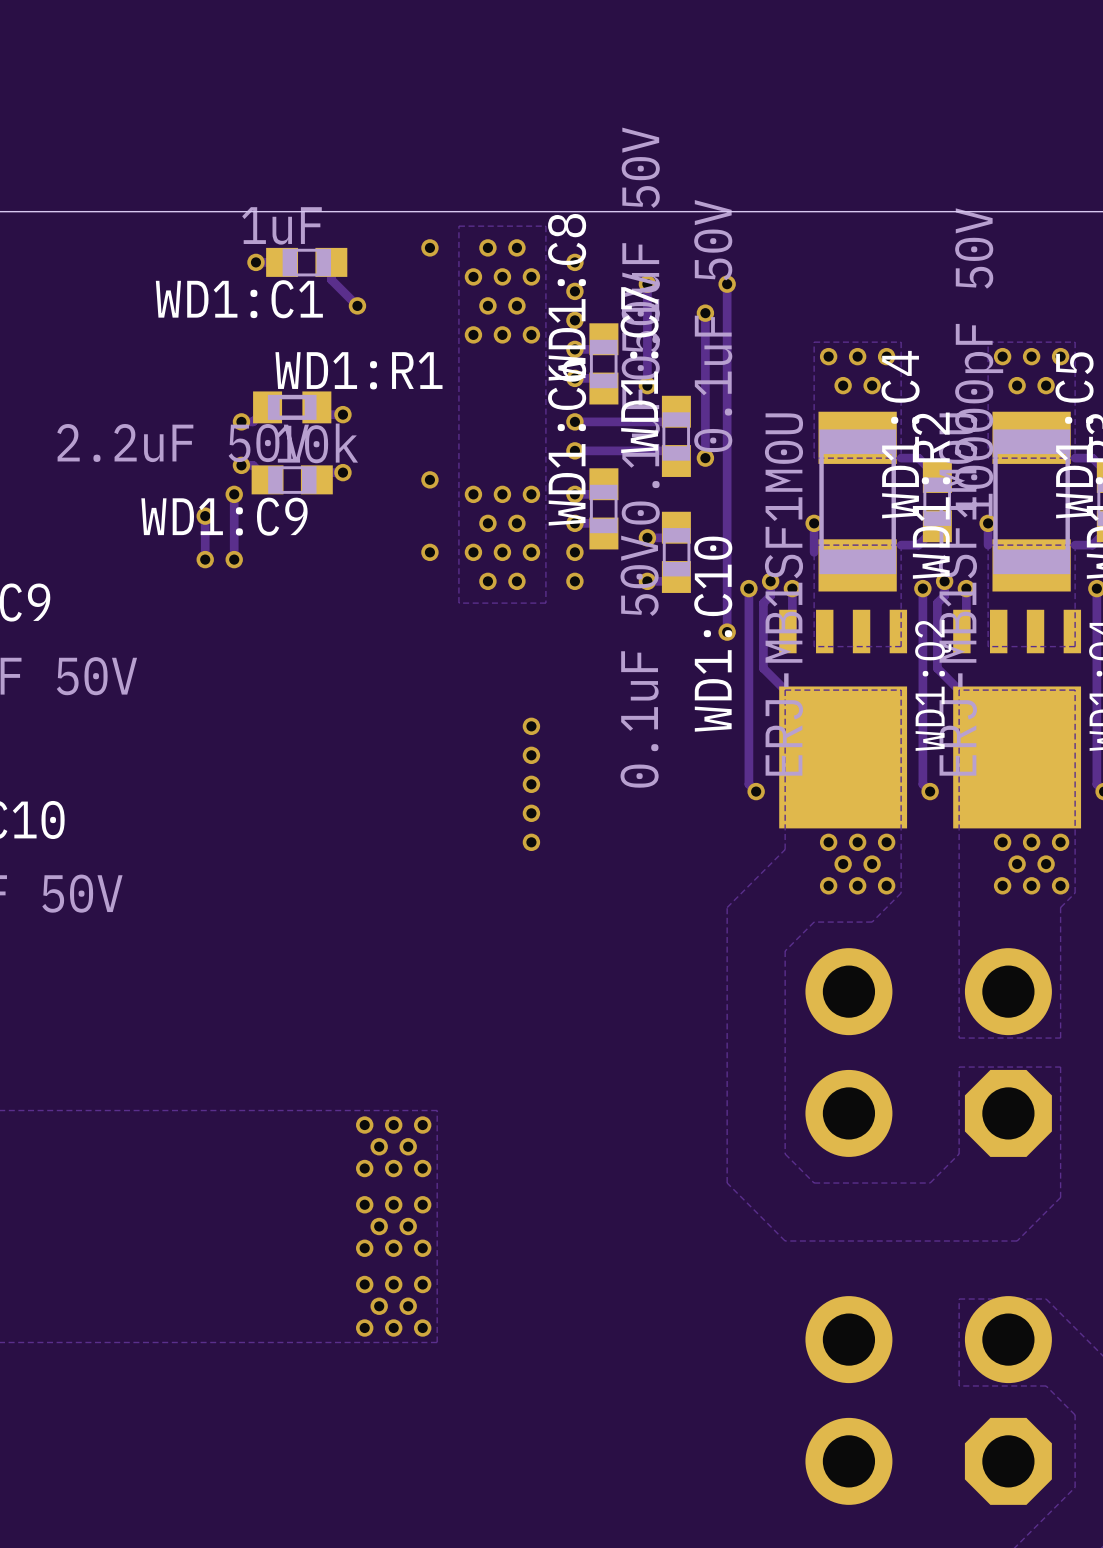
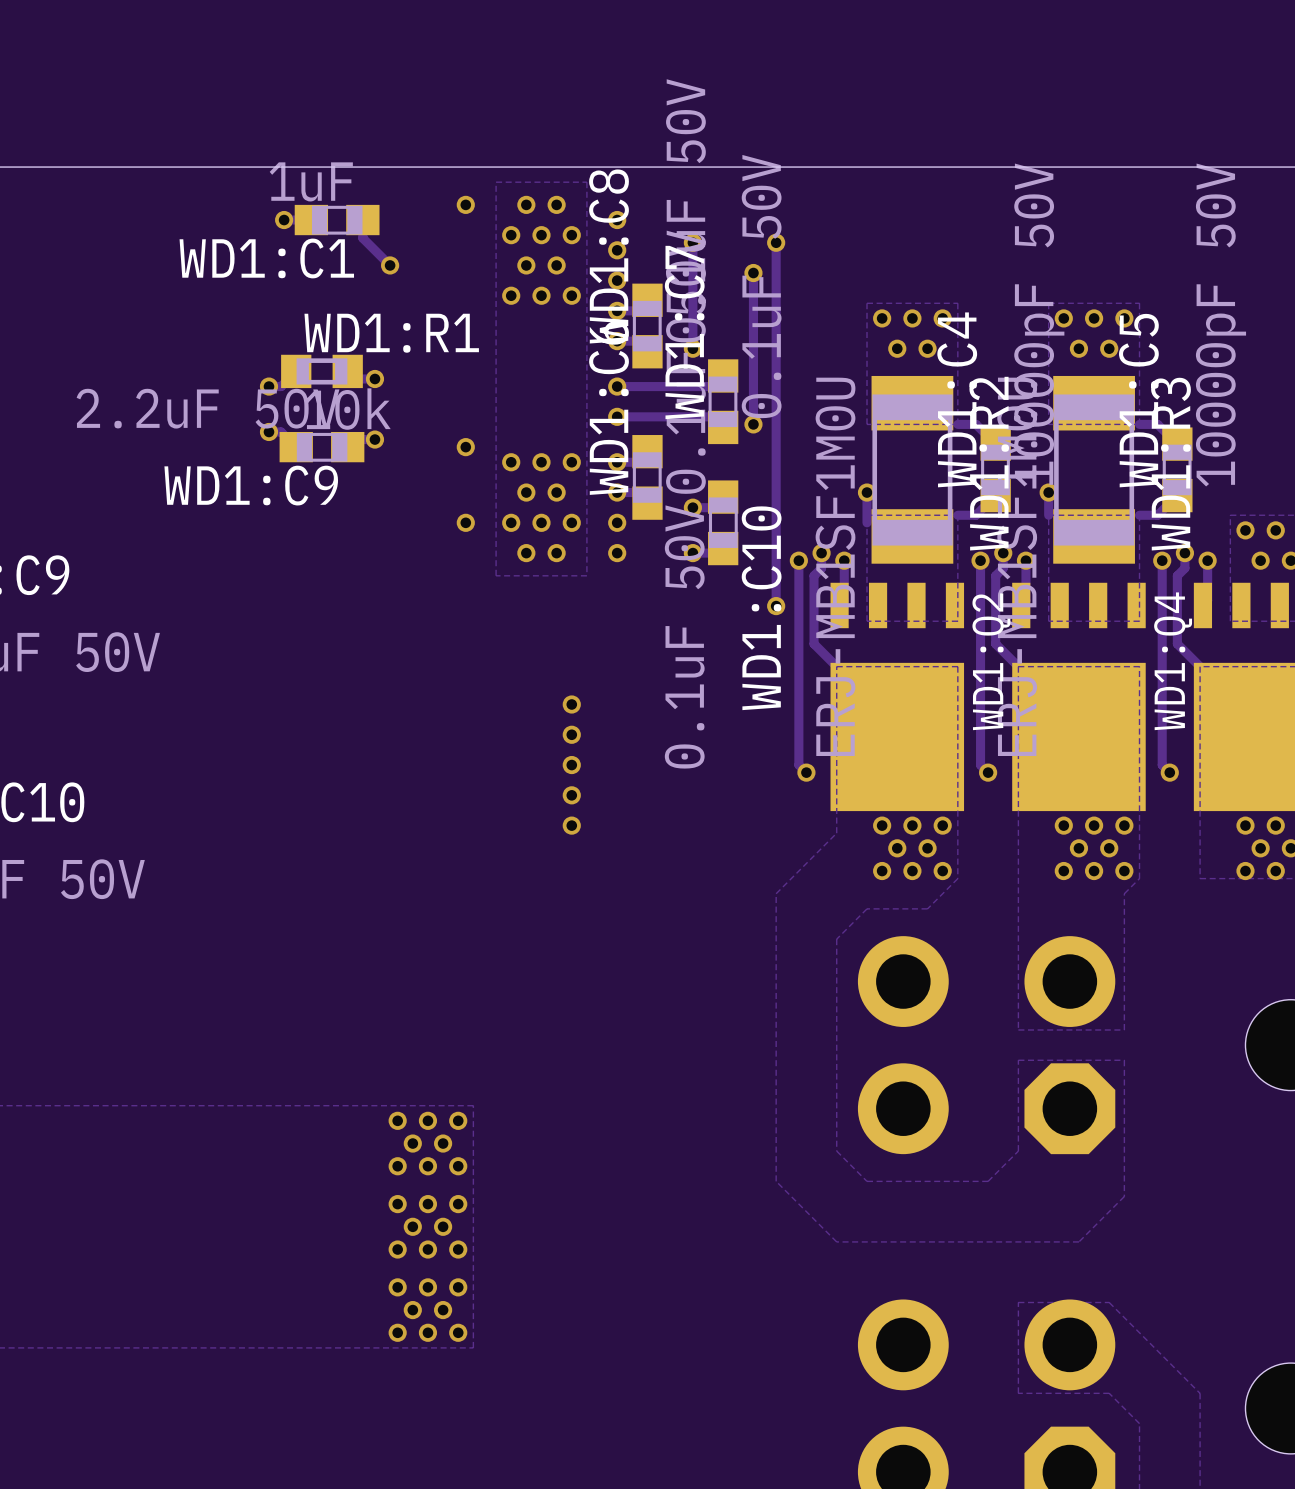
track: (234, 494) (234, 559) -> none
via: (234, 494) -> none
track: (205, 516) (205, 559) -> none
via: (205, 516) -> none
via: (205, 559) -> none
via: (234, 559) -> none

